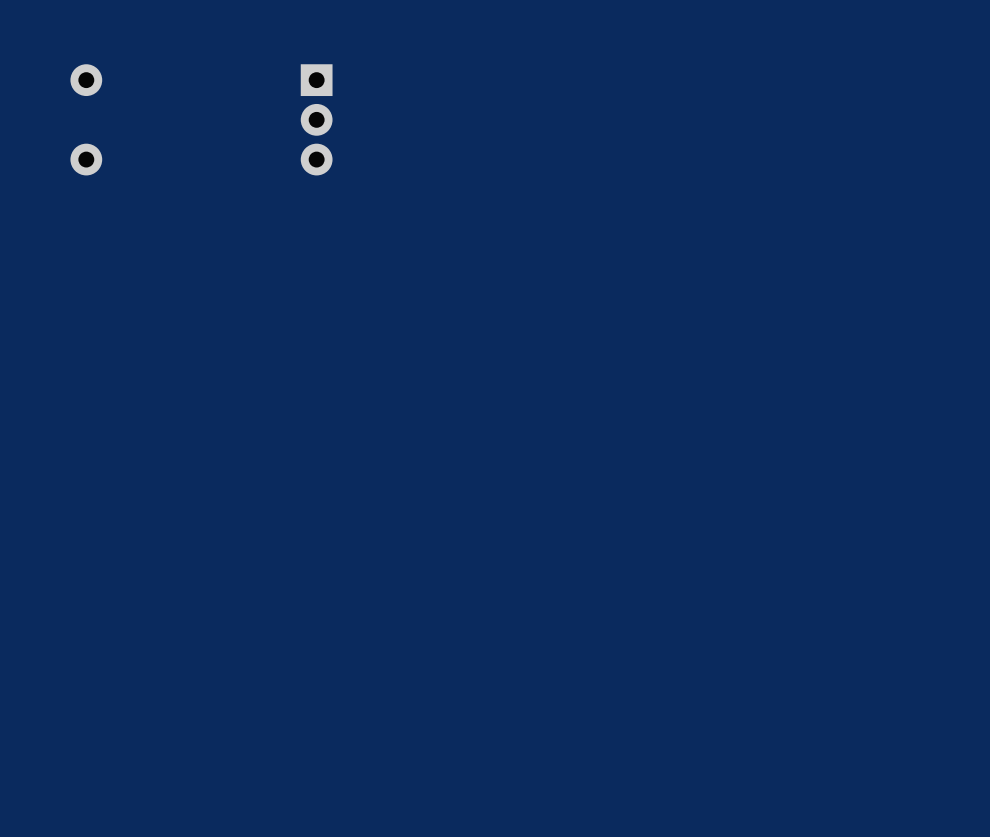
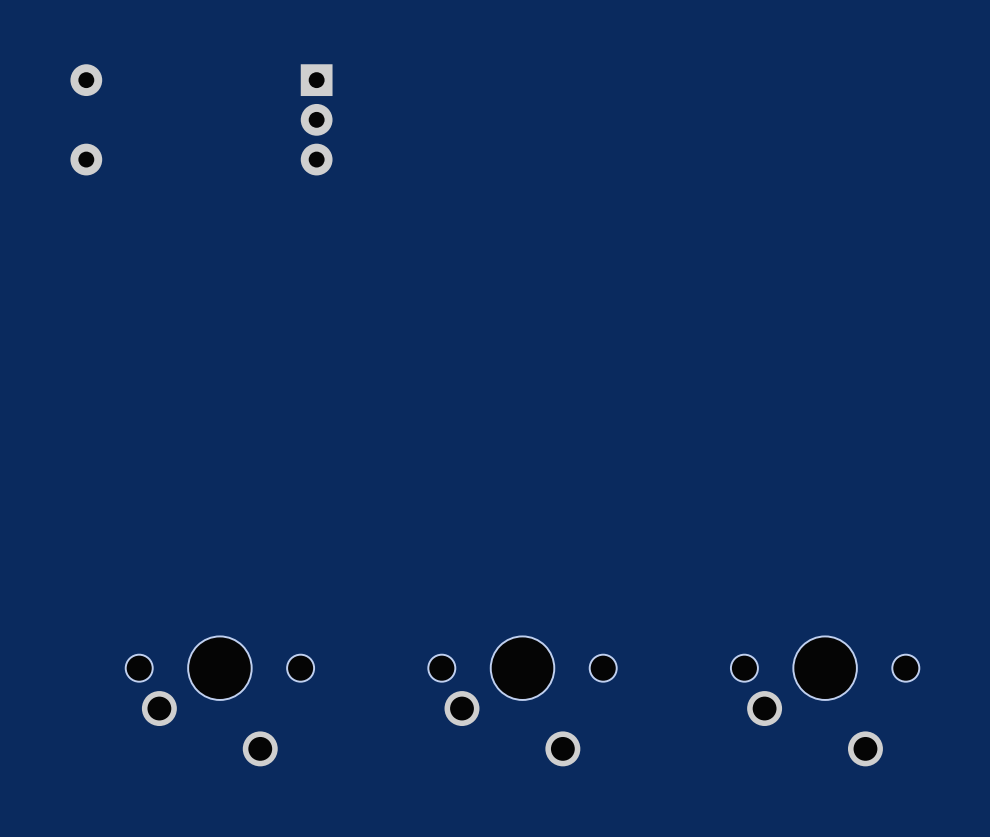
part: none -> (219, 701)
part: none -> (522, 701)
part: none -> (825, 701)

